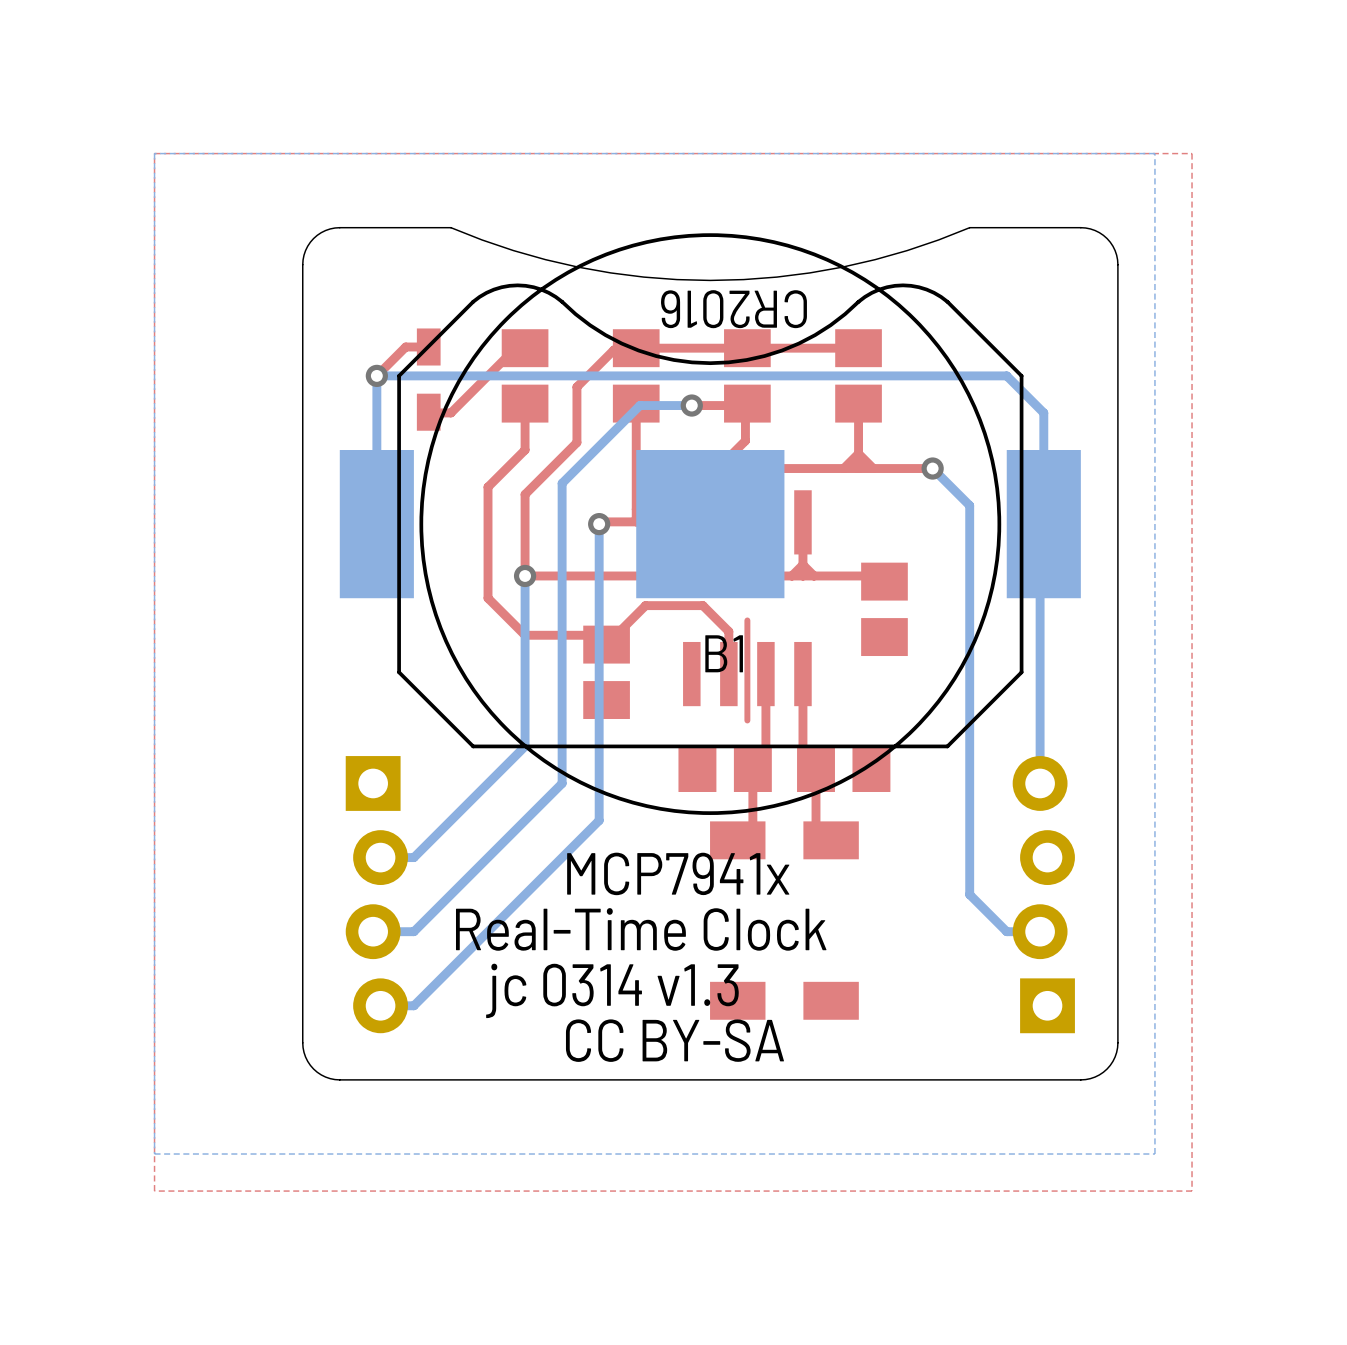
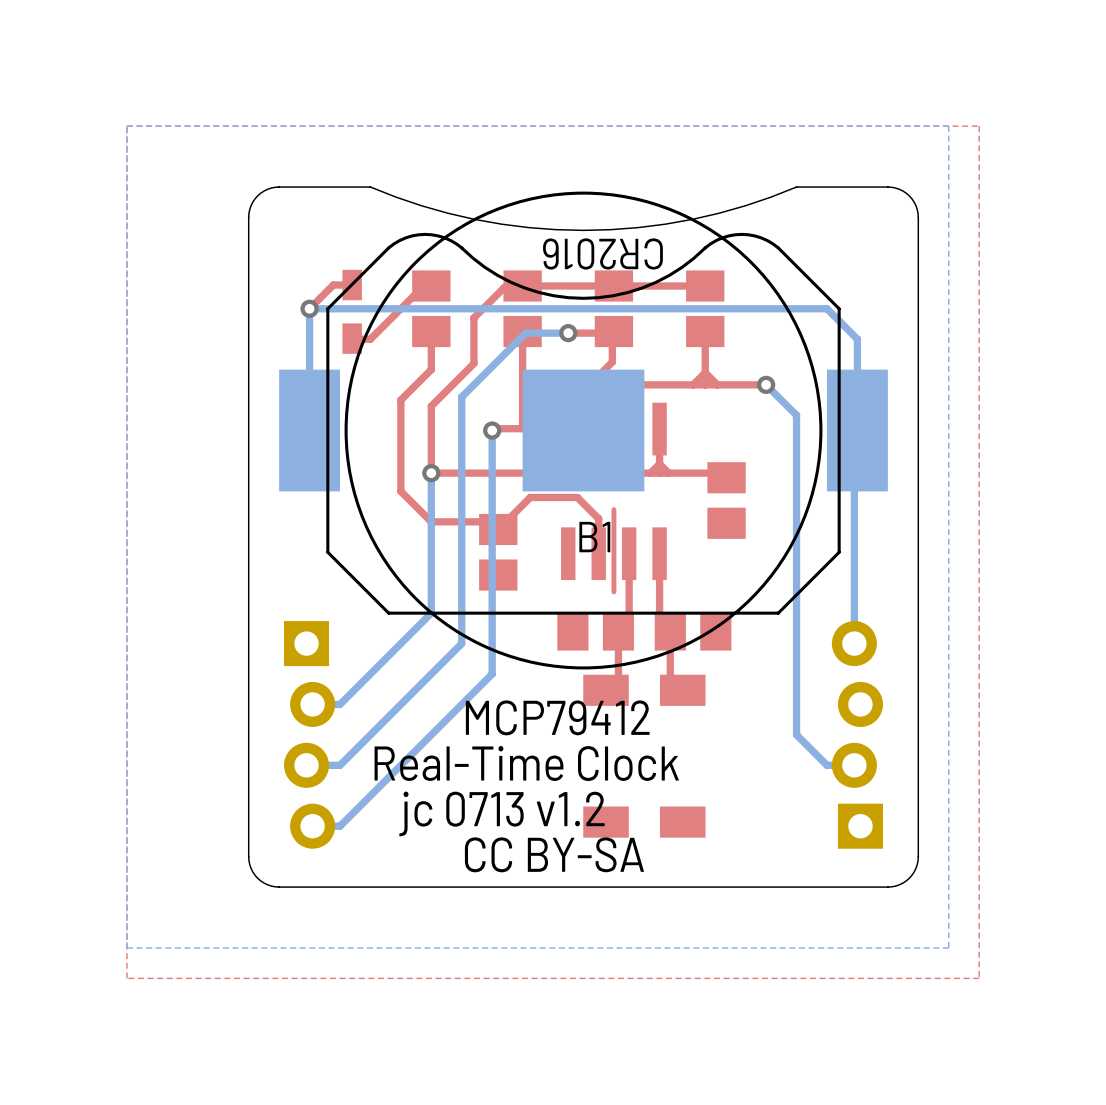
text: MCP7941x (678, 873) -> MCP79412 (557, 717)
text: jc 0314 v1.3 (612, 990) -> jc 0713 v1.2 (501, 813)

